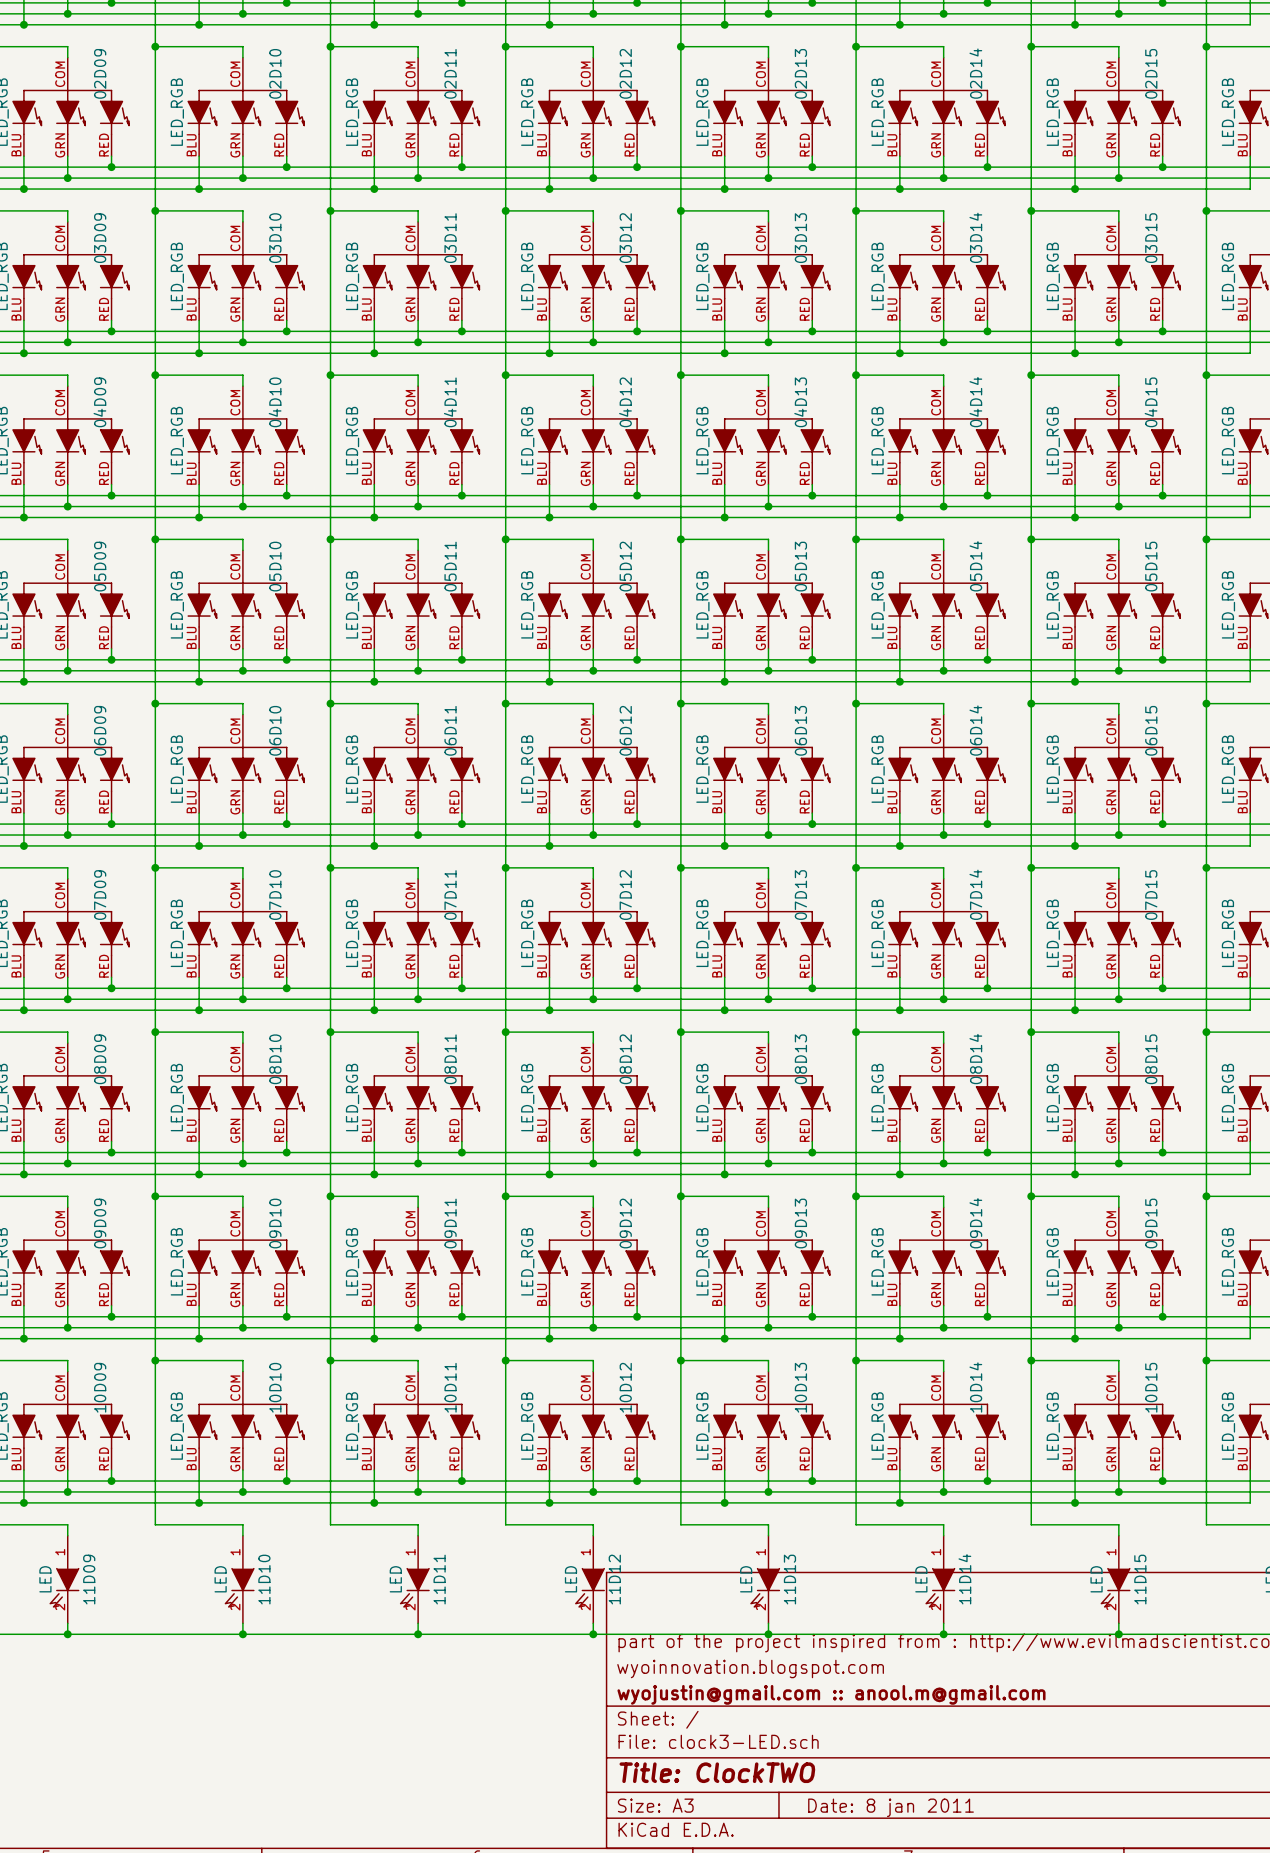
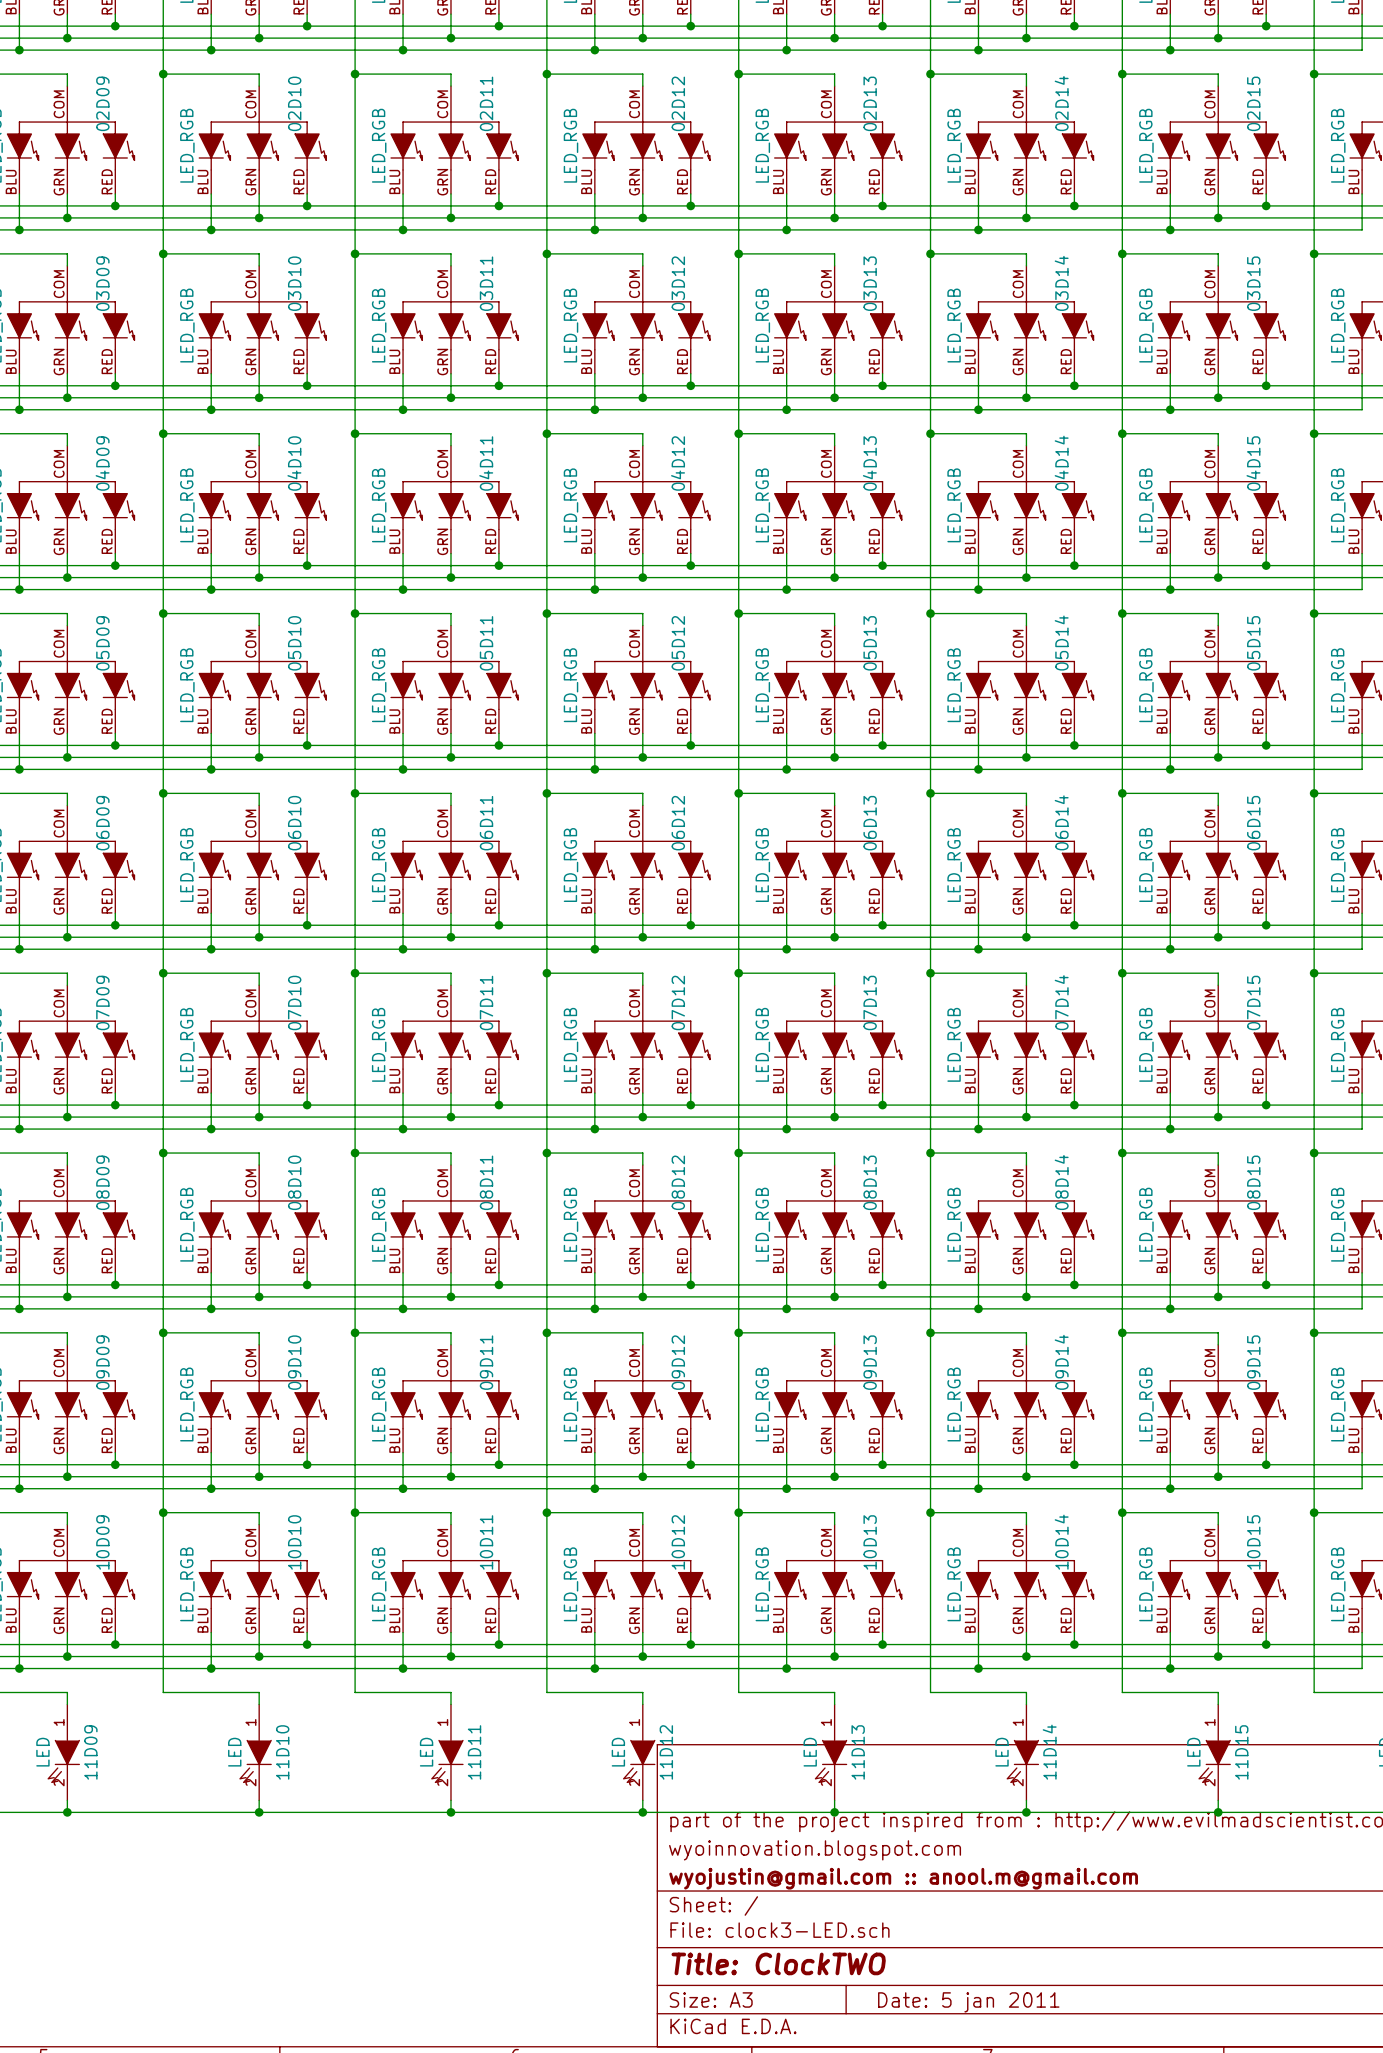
title block: Date: 8 jan 2011 (891, 1807) -> Date: 5 jan 2011 (968, 2002)

